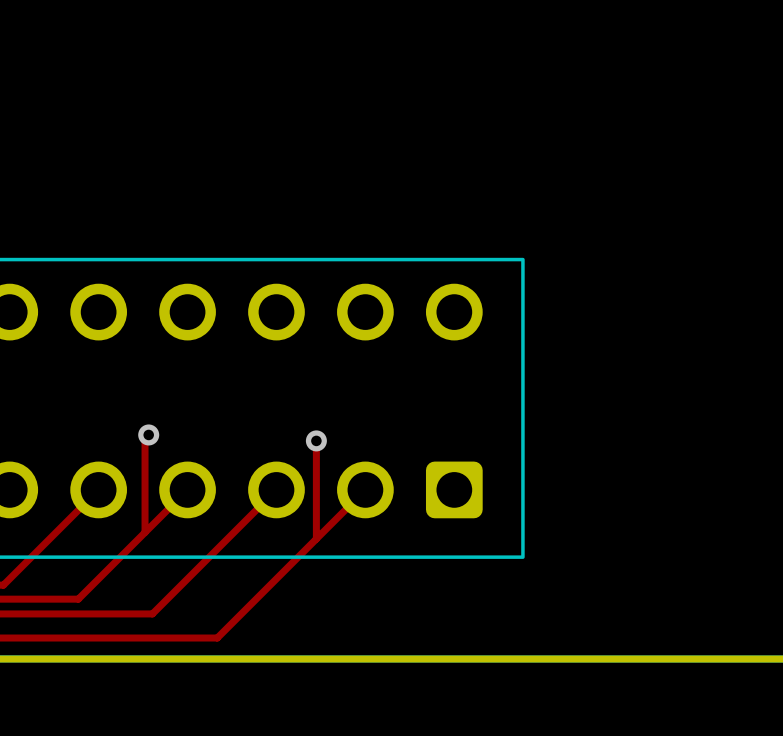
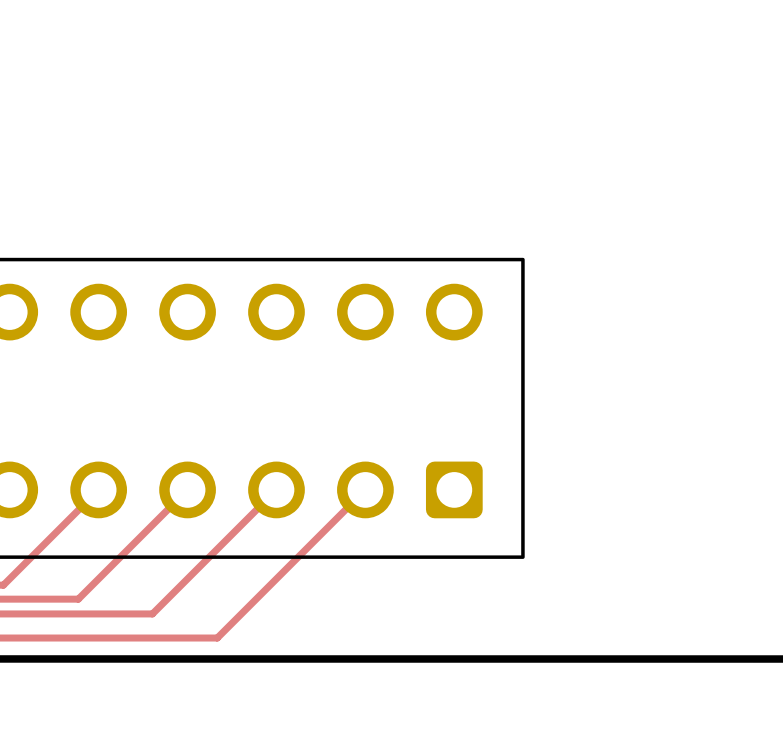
track: (148, 434) (145, 438) (145, 532) -> none
via: (148, 434) -> none
track: (316, 440) (316, 538) -> none
via: (316, 440) -> none

